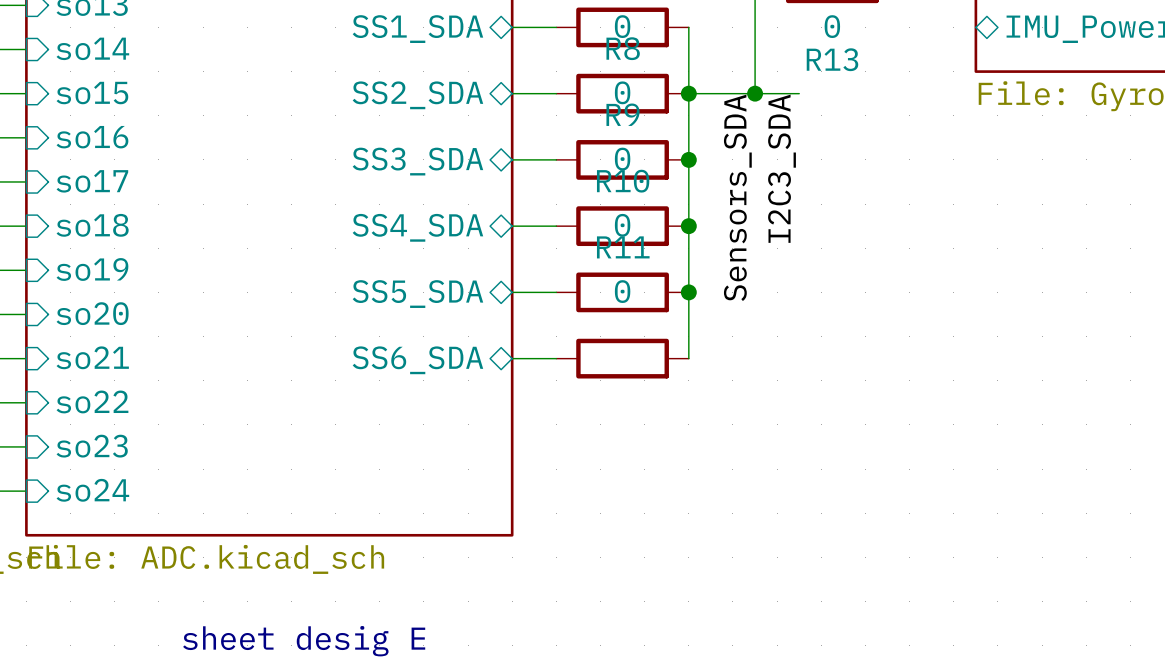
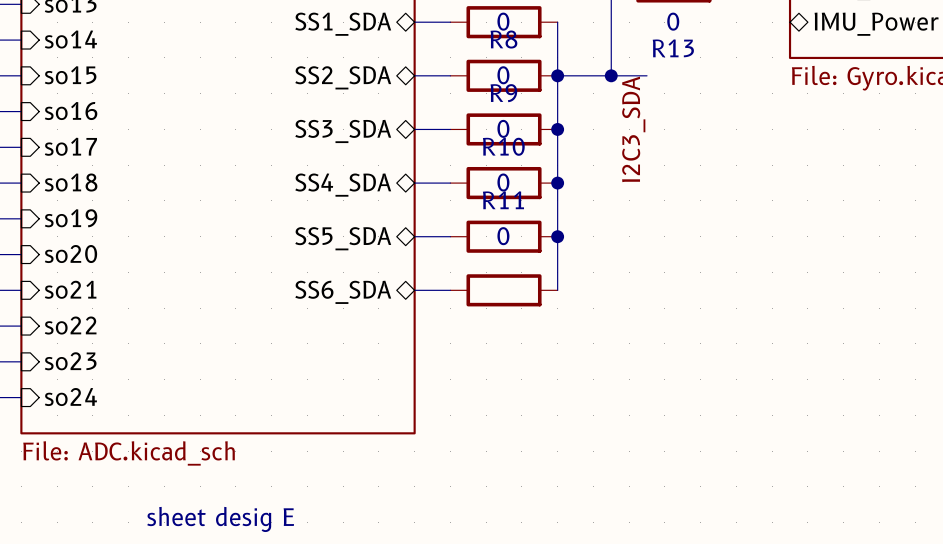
label: Sensors_SDA (737, 197) -> none

